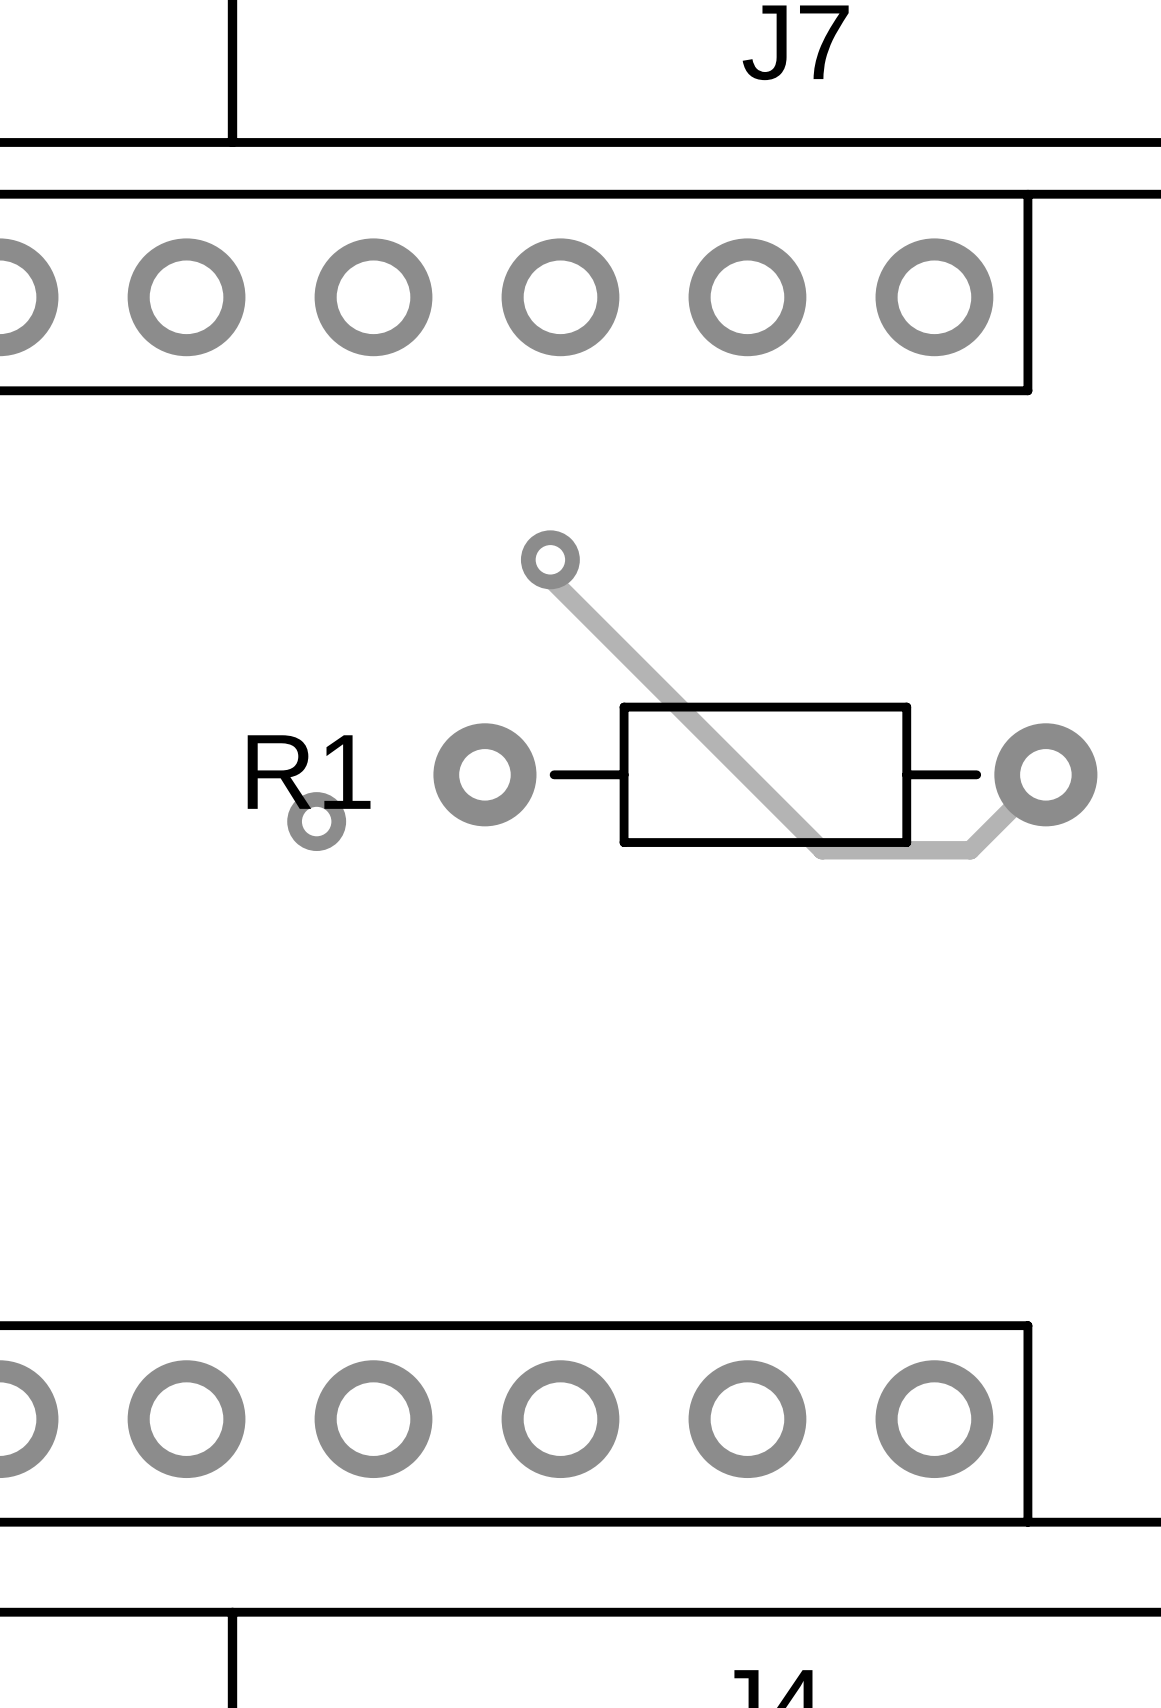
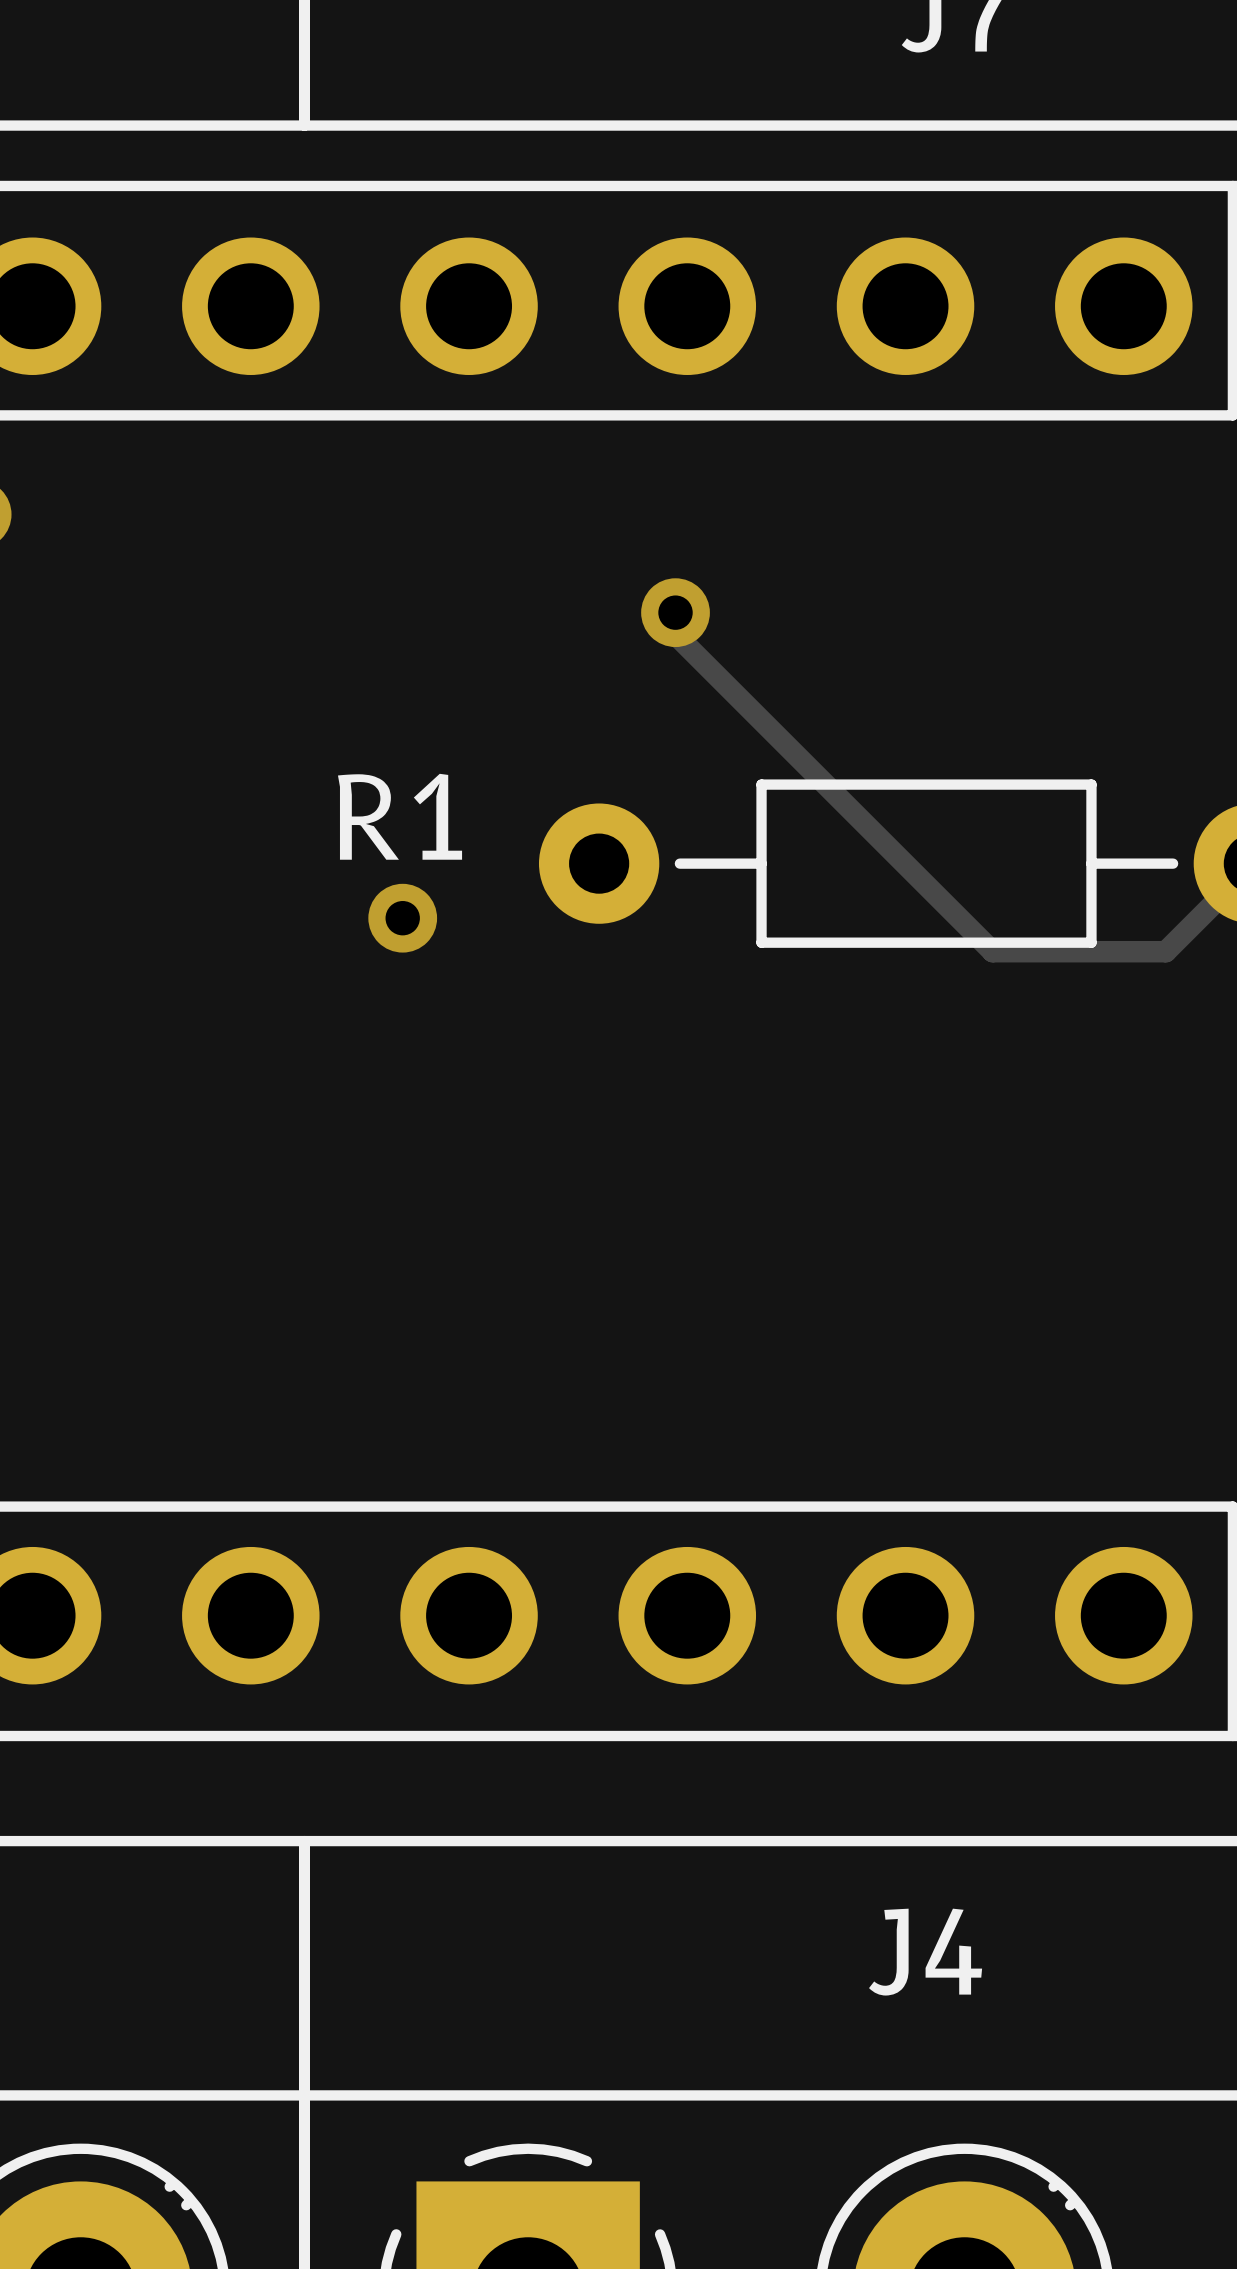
R1 name position: R1 (309, 772) -> R1 (400, 816)

